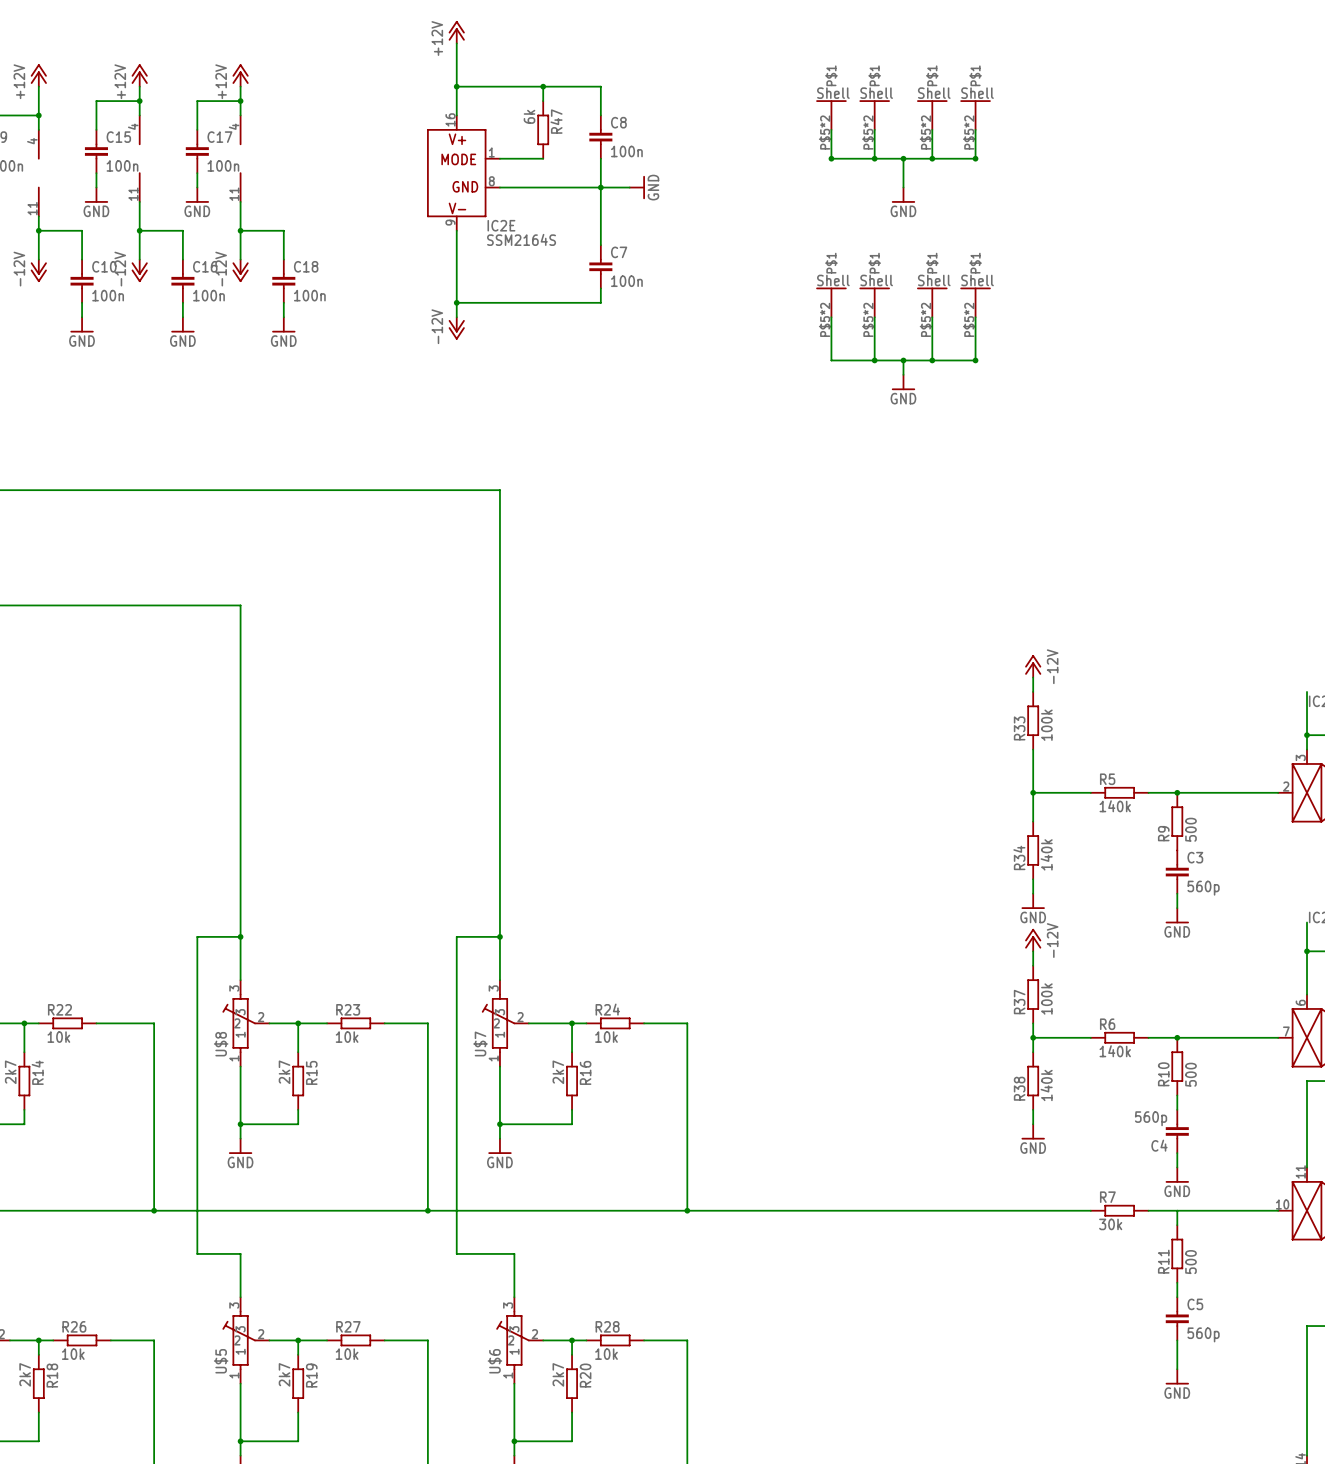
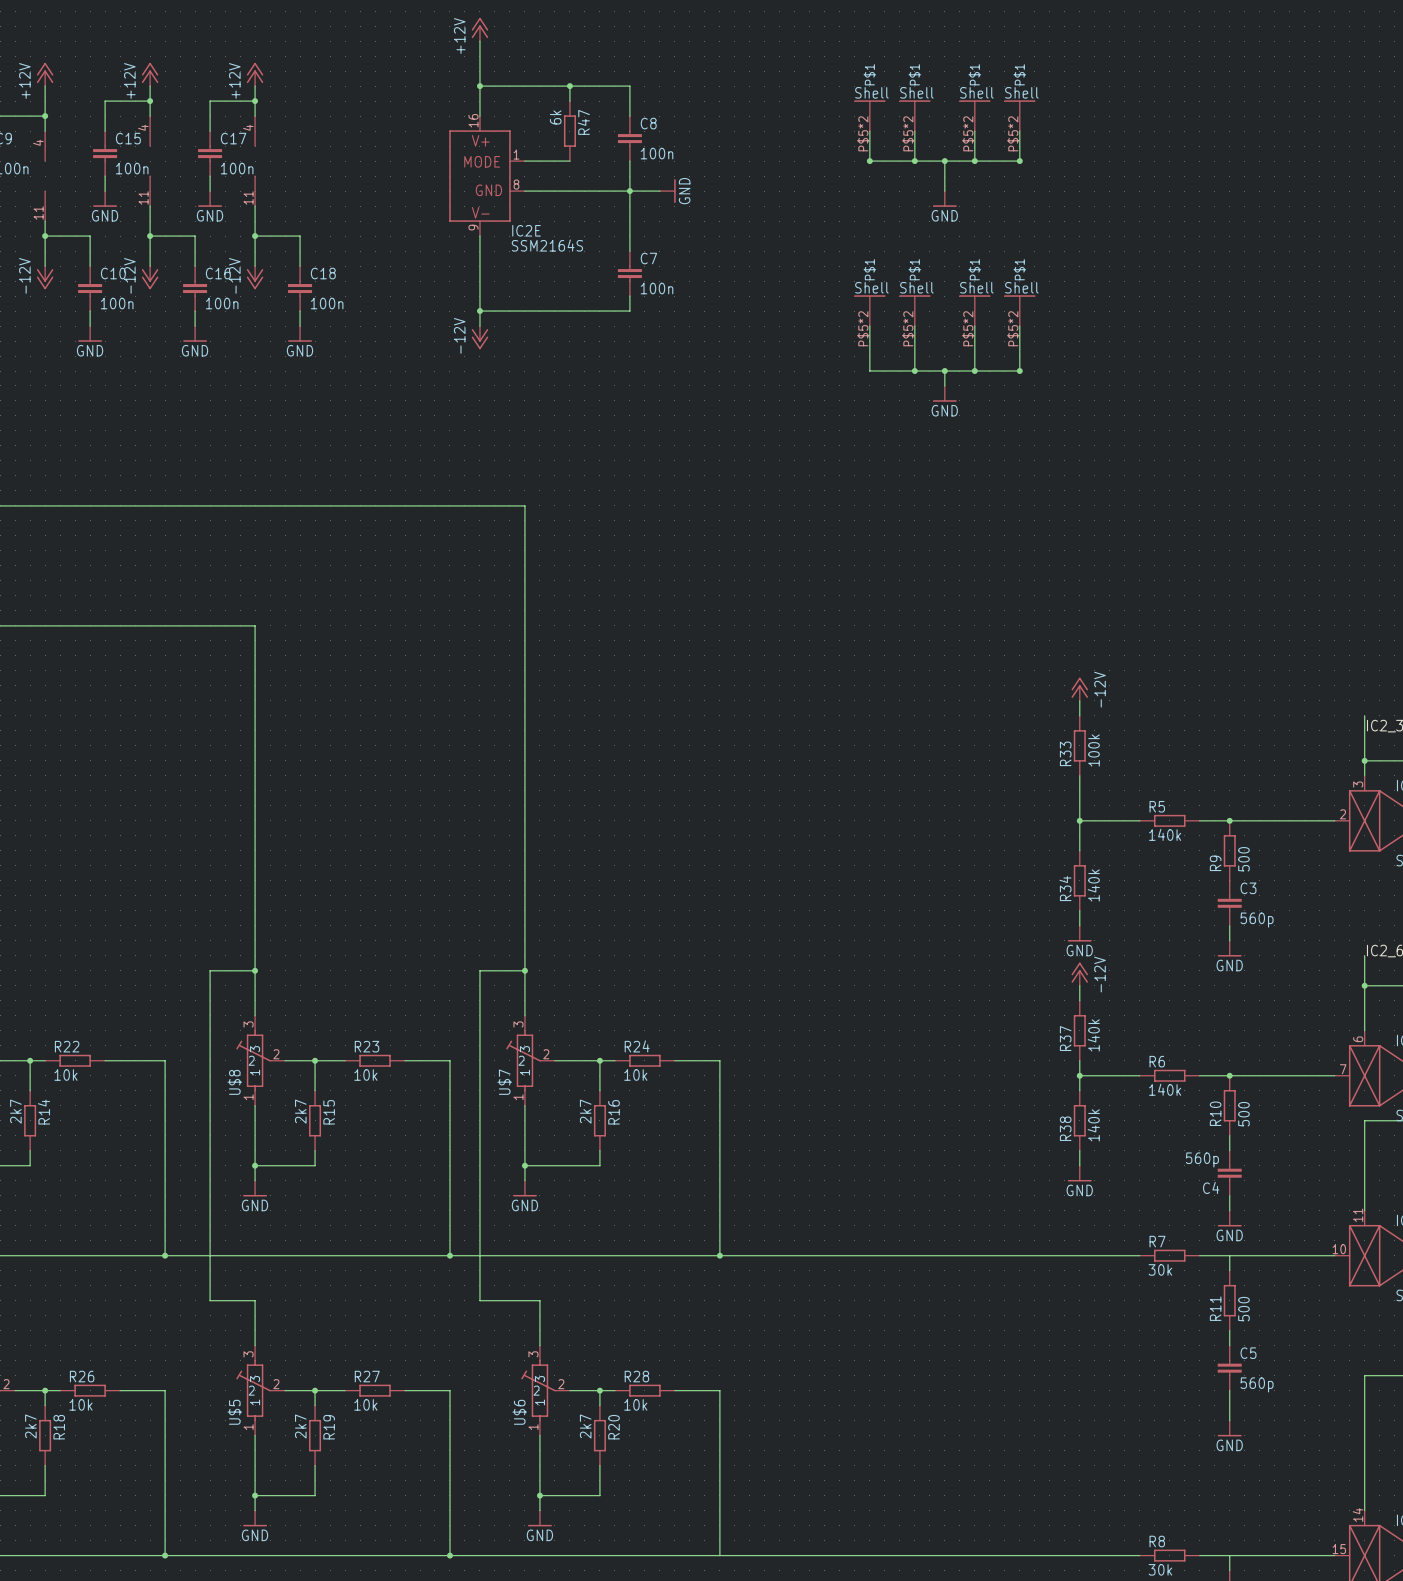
R37 value: 100k (1046, 999) -> 140k (1093, 1035)

